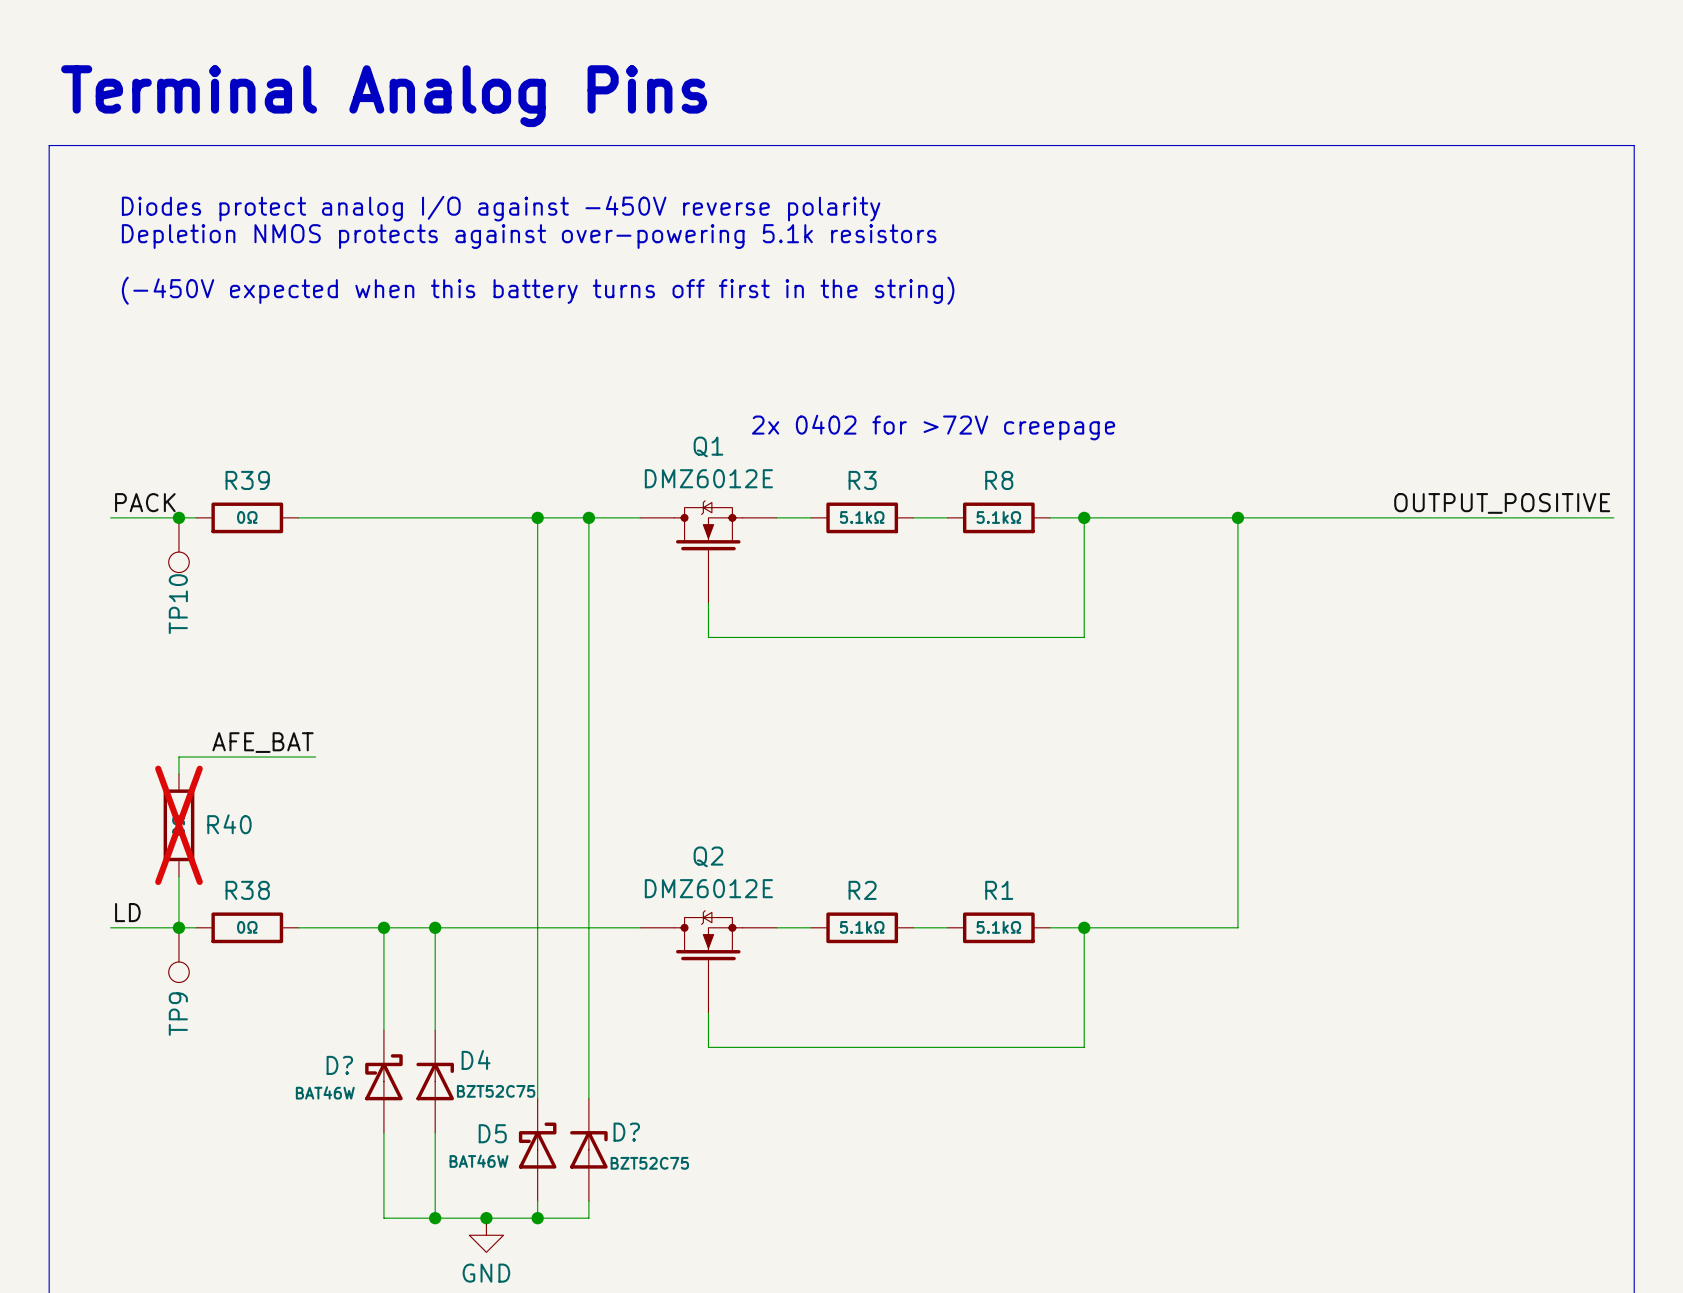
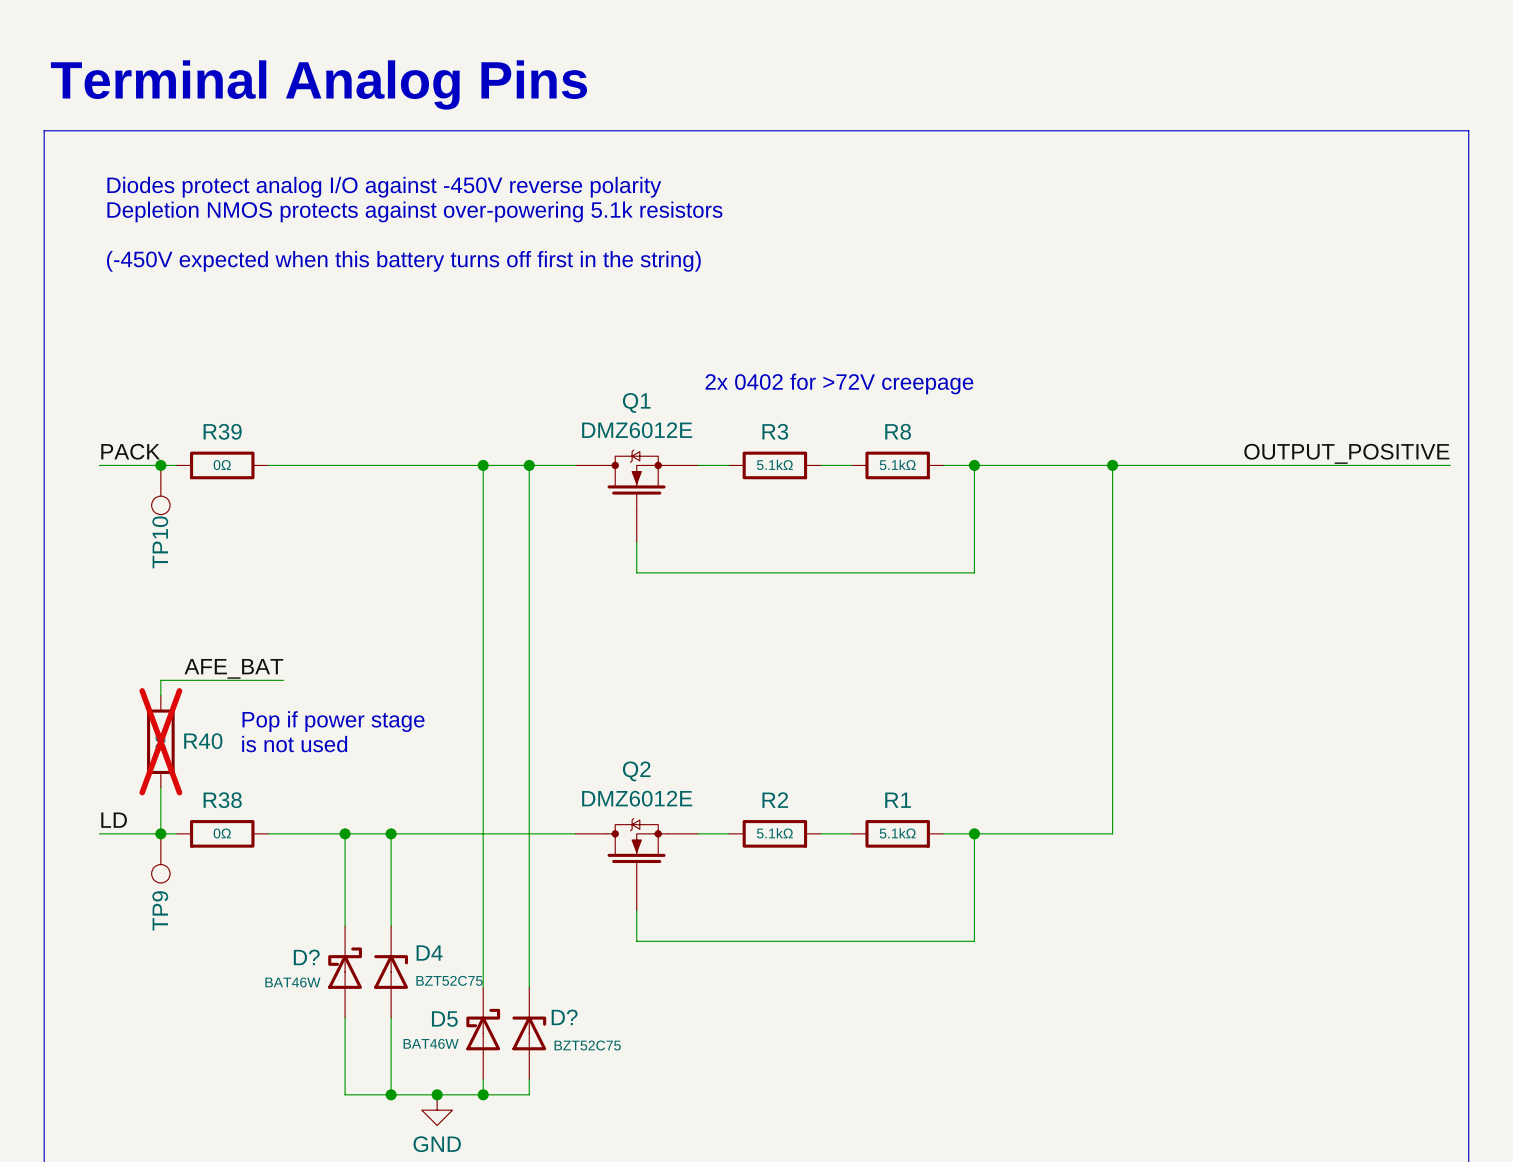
text: none -> Pop if power stage (333, 721)
text: none -> is not used (294, 744)

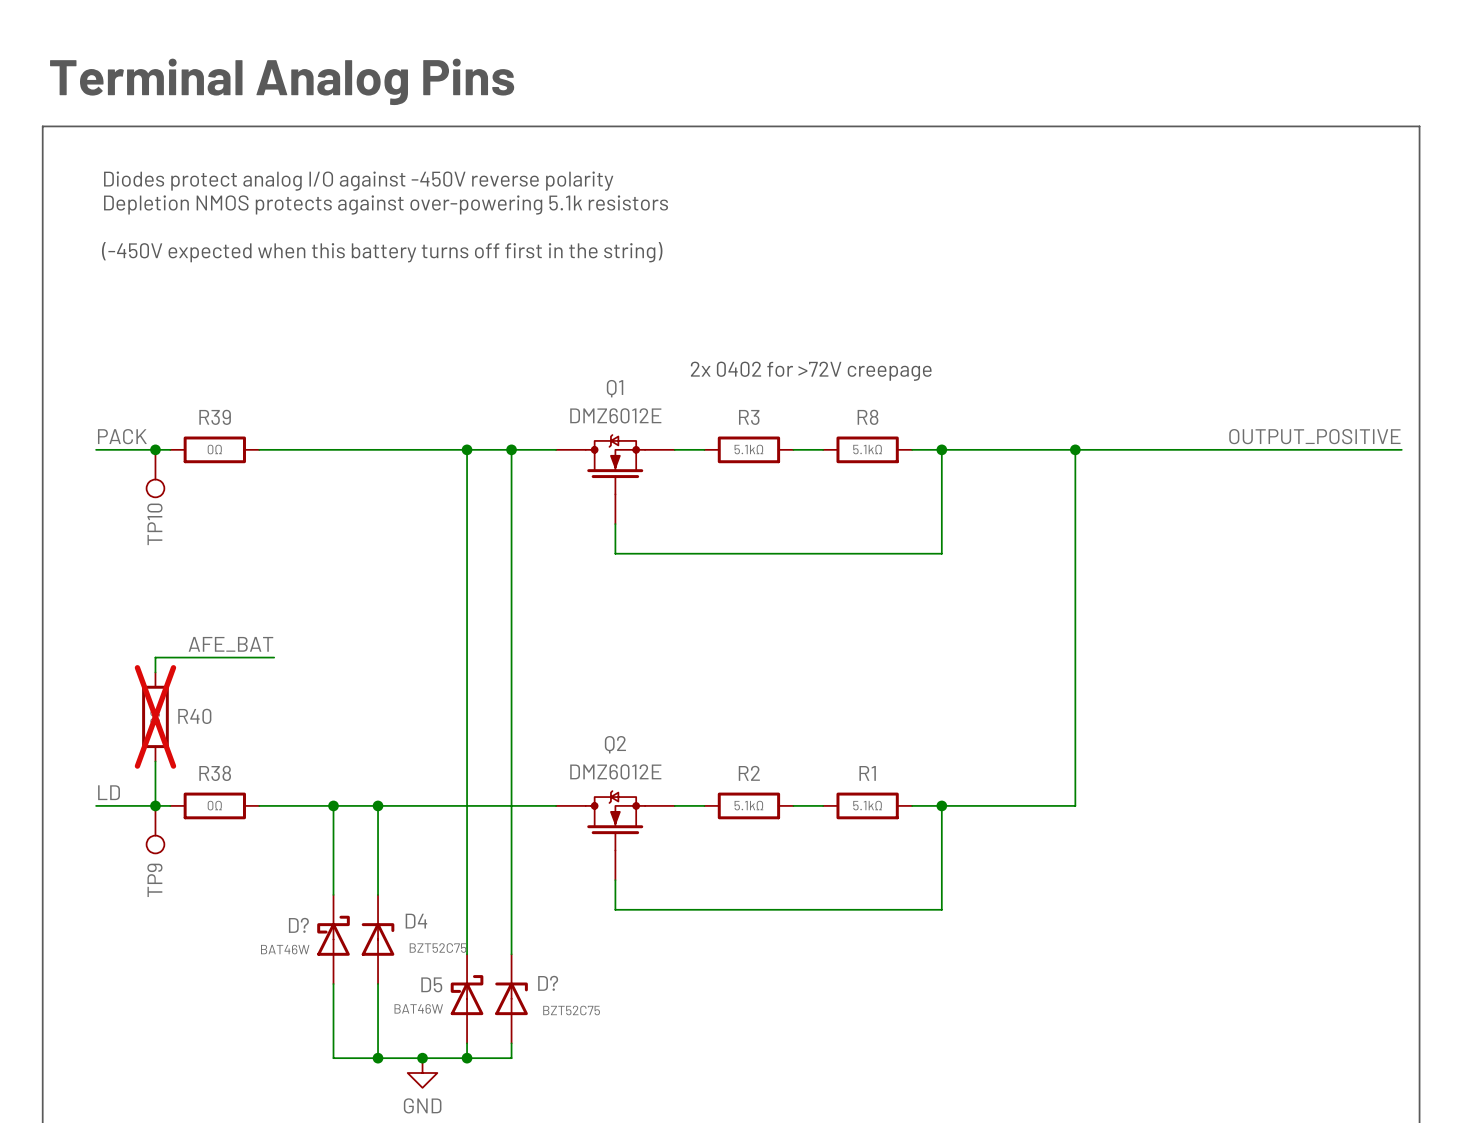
text: Pop if power stage (333, 721) -> none
text: is not used (294, 744) -> none

